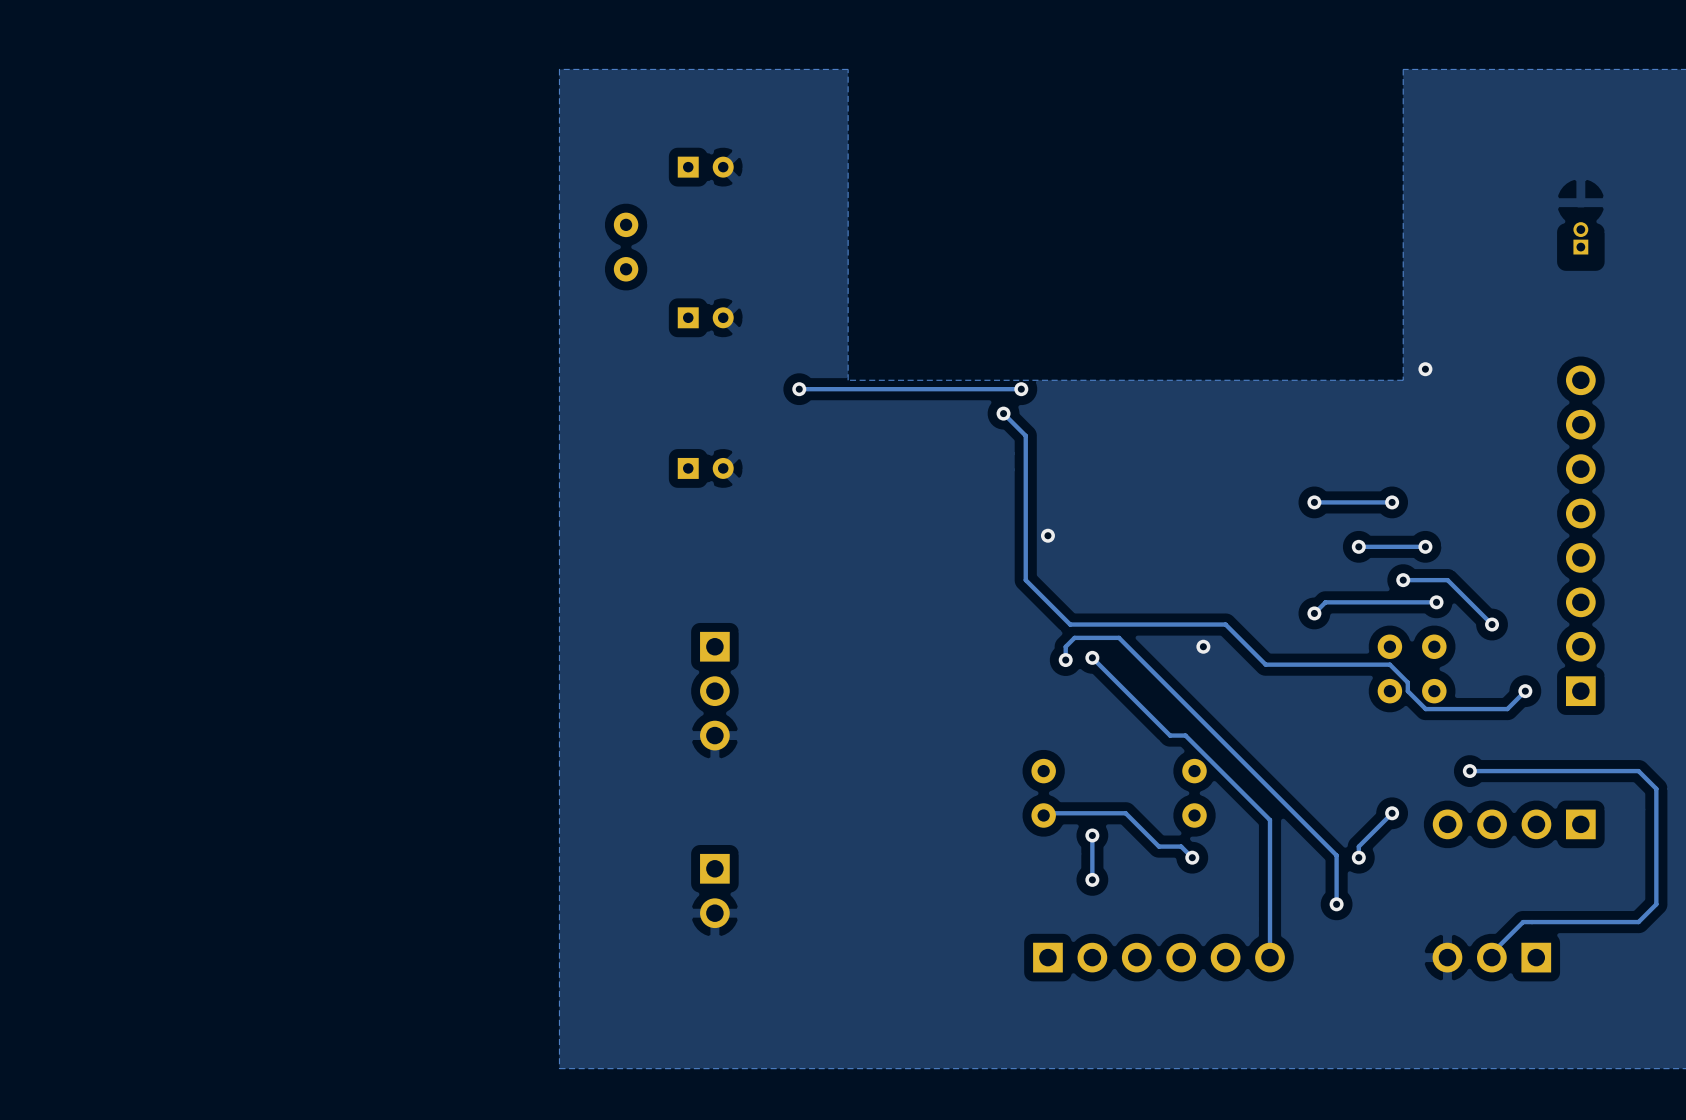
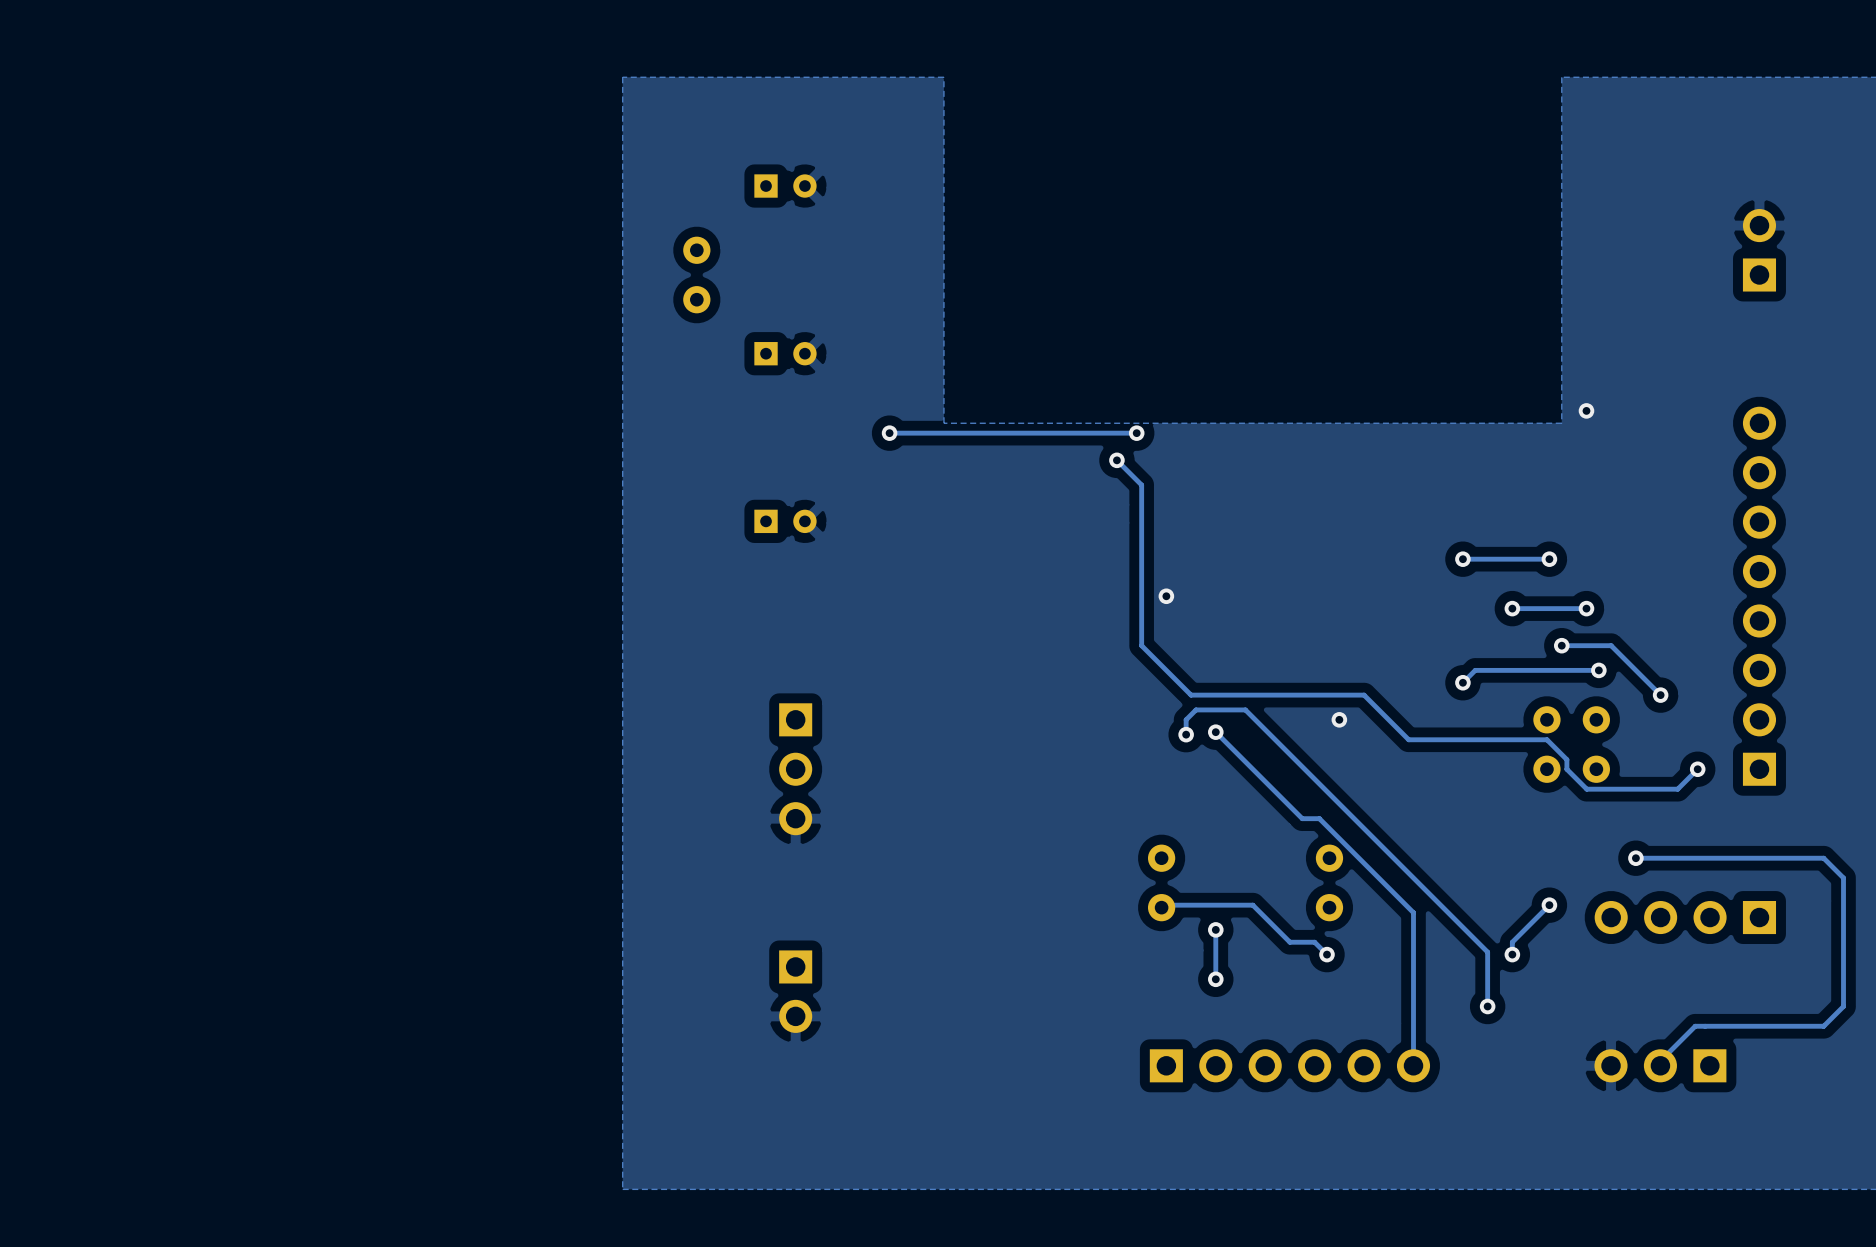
part footprint: [1573, 222, 1589, 255] -> [1742, 209, 1777, 292]

